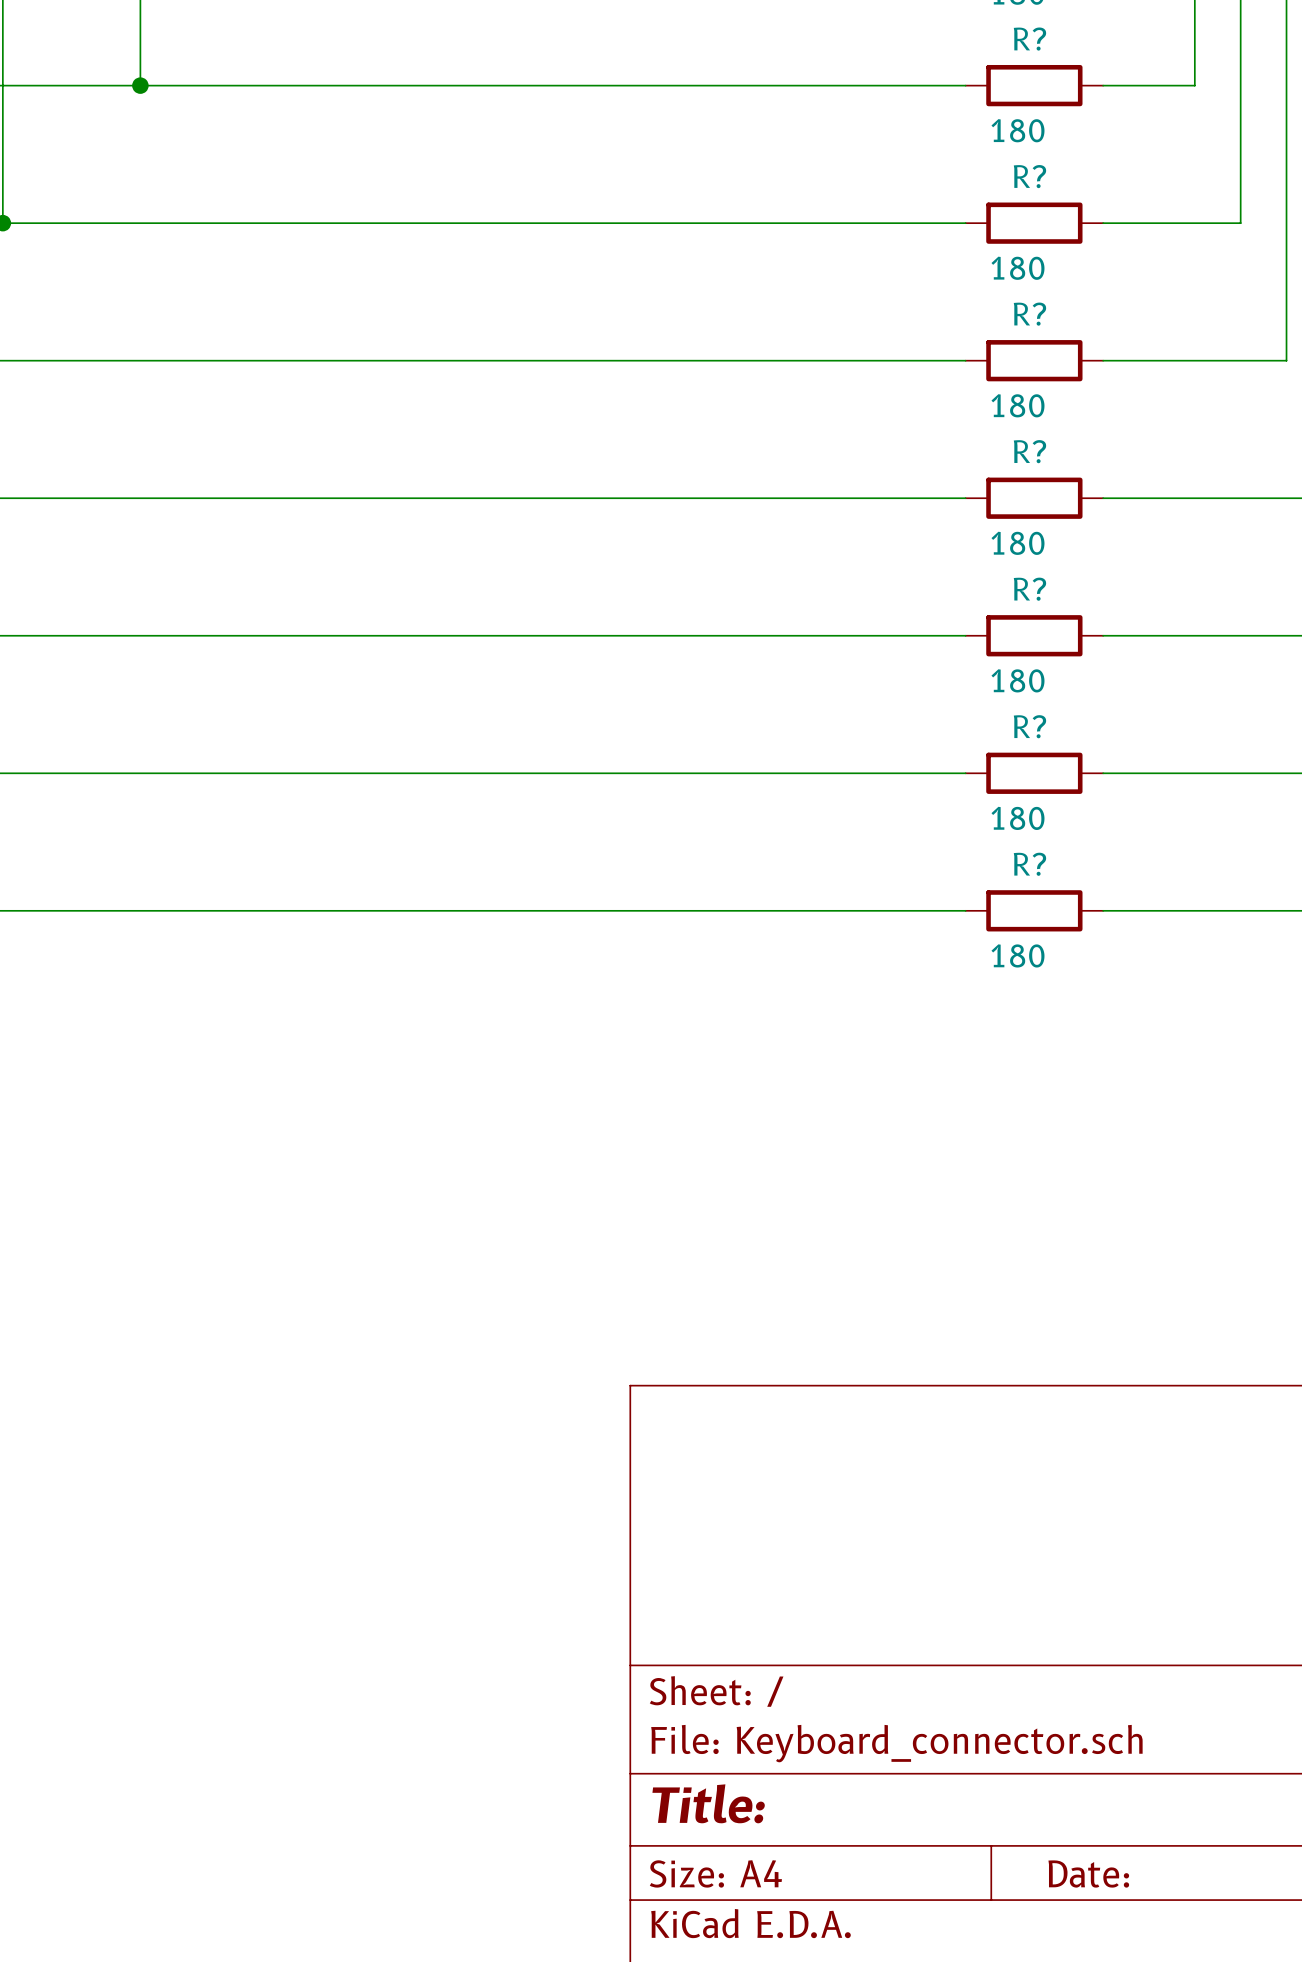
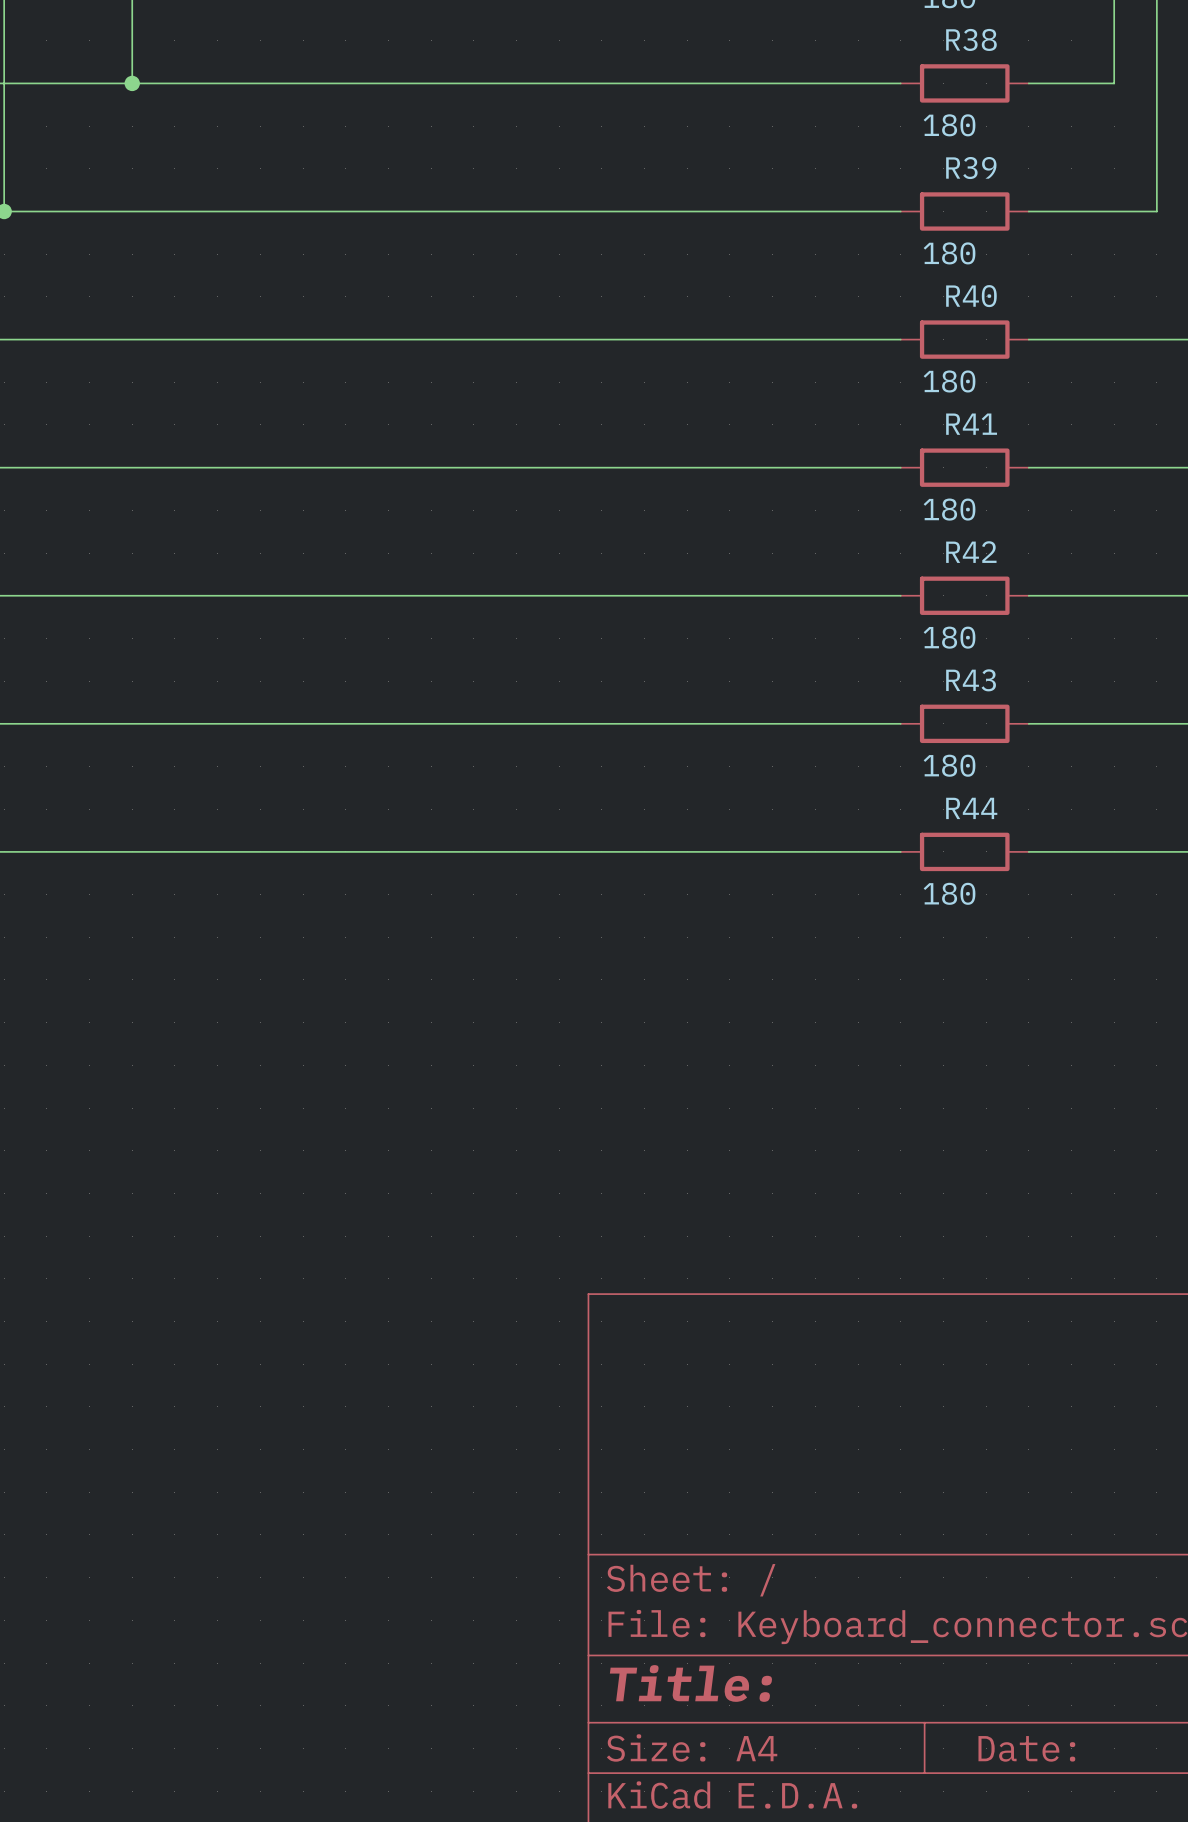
R? name: R? (1029, 39) -> R38 (971, 39)
R? name: R? (1029, 176) -> R39 (971, 168)
R? name: R? (1029, 314) -> R40 (971, 296)
R? name: R? (1029, 451) -> R41 (971, 424)
R? name: R? (1029, 589) -> R42 (971, 552)
R? name: R? (1029, 726) -> R43 (971, 680)
R? name: R? (1029, 864) -> R44 (971, 808)

